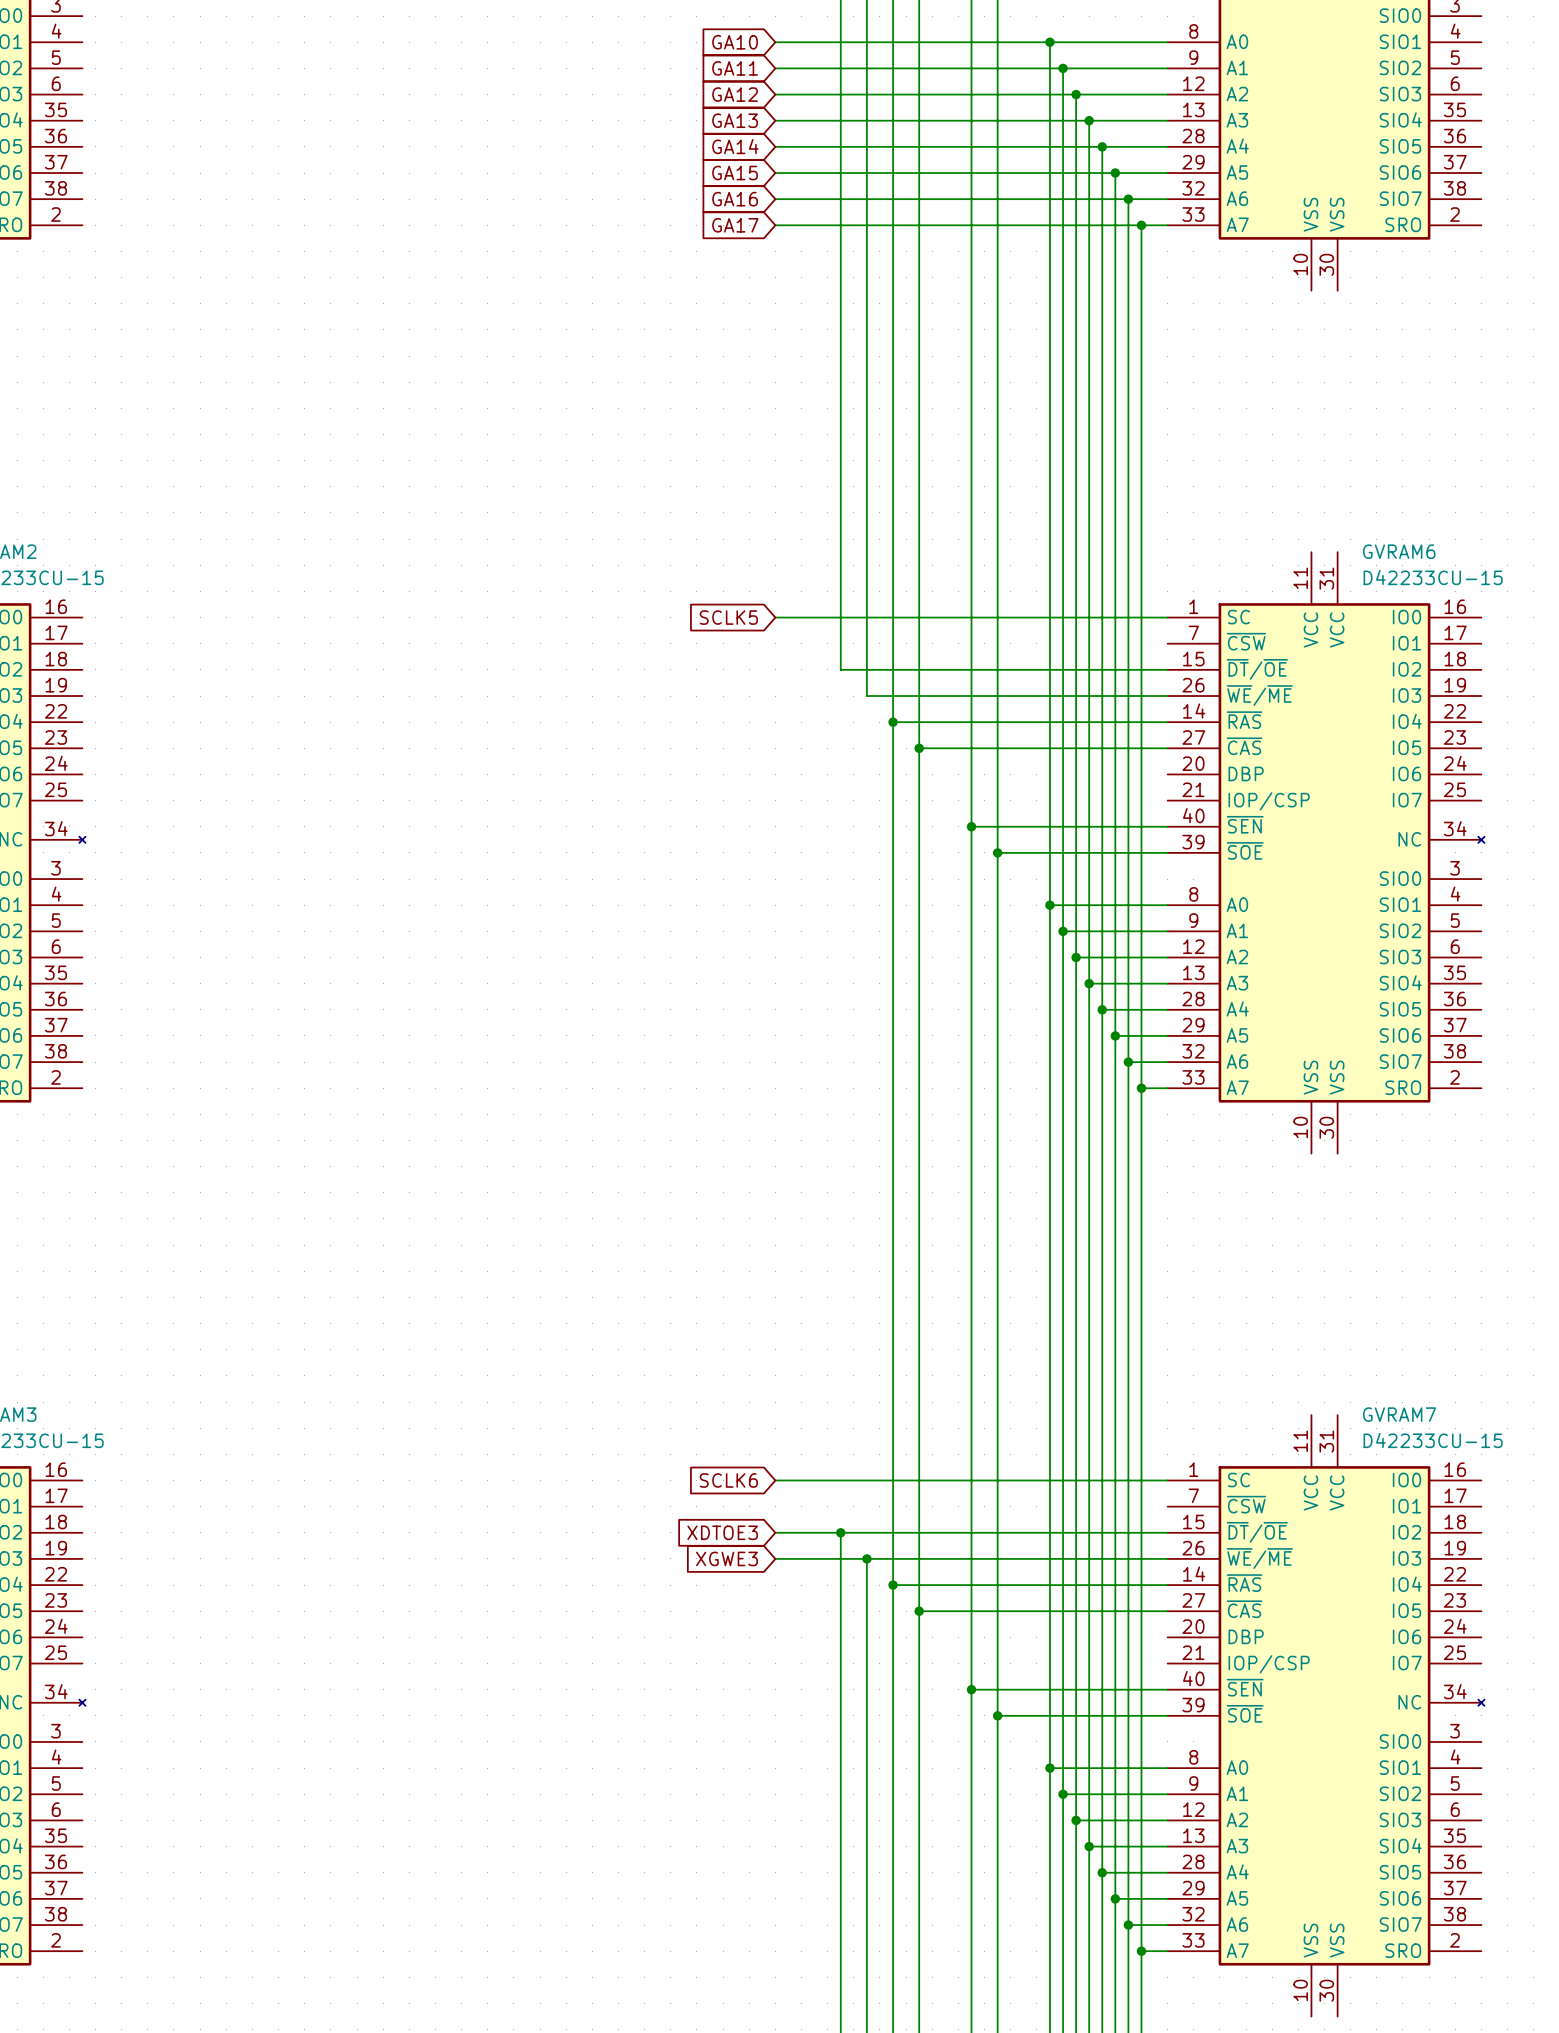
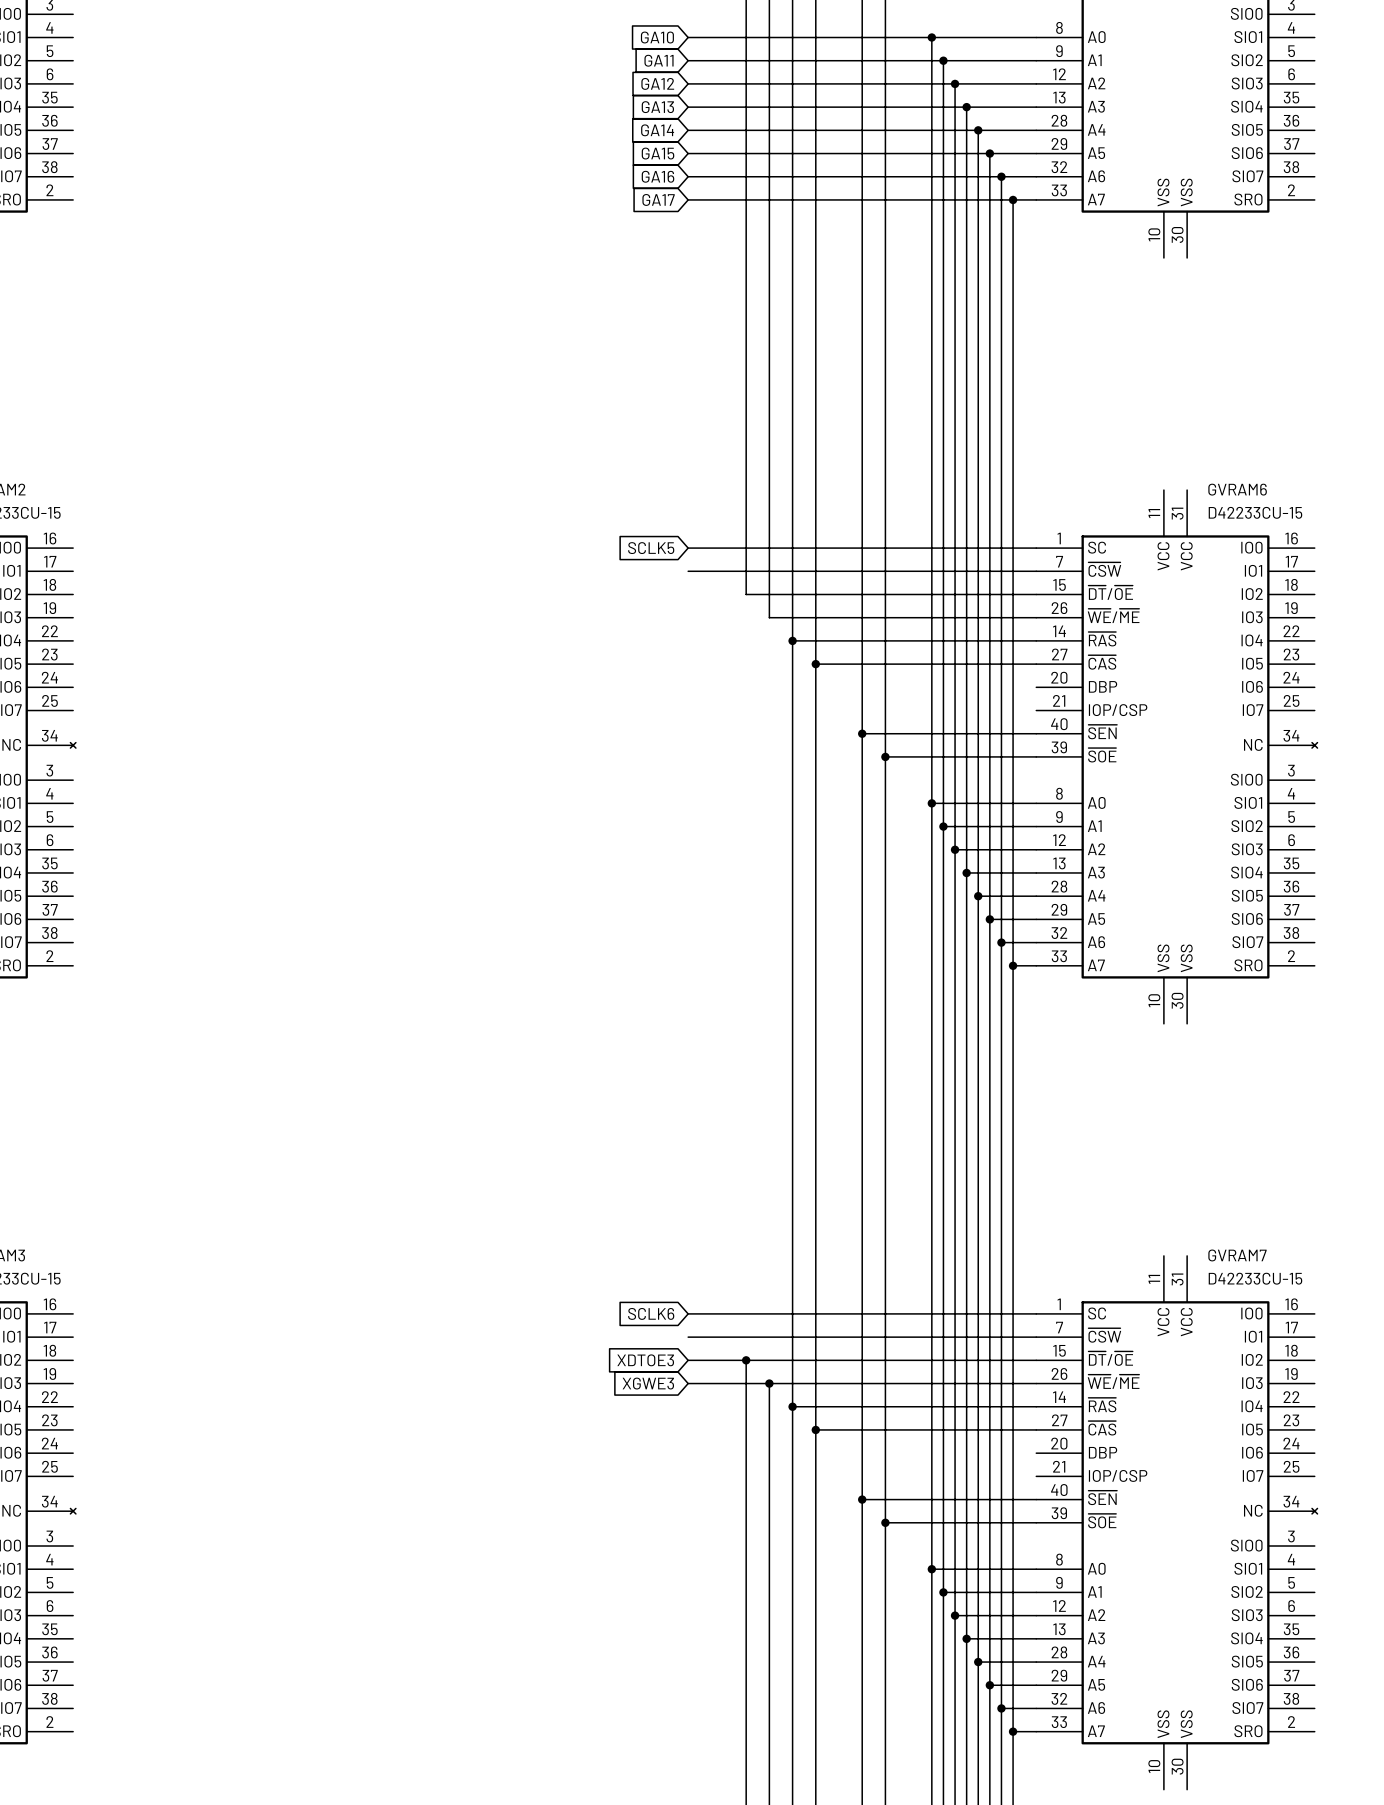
wire: none -> (688, 571) (1036, 571)
wire: none -> (688, 1337) (1036, 1337)

